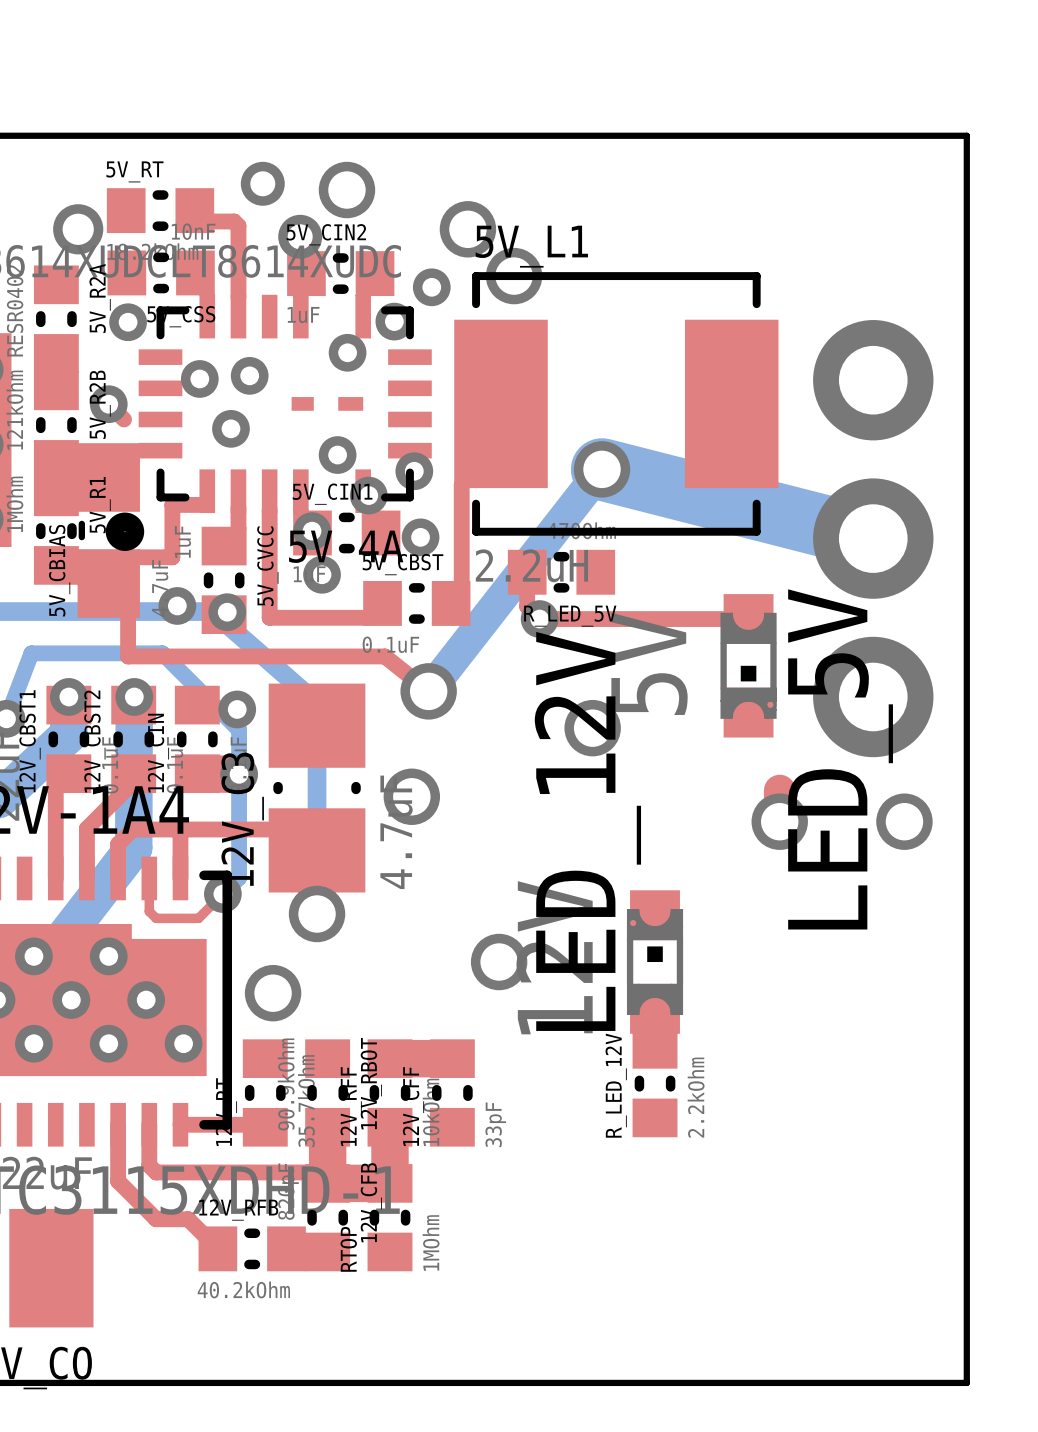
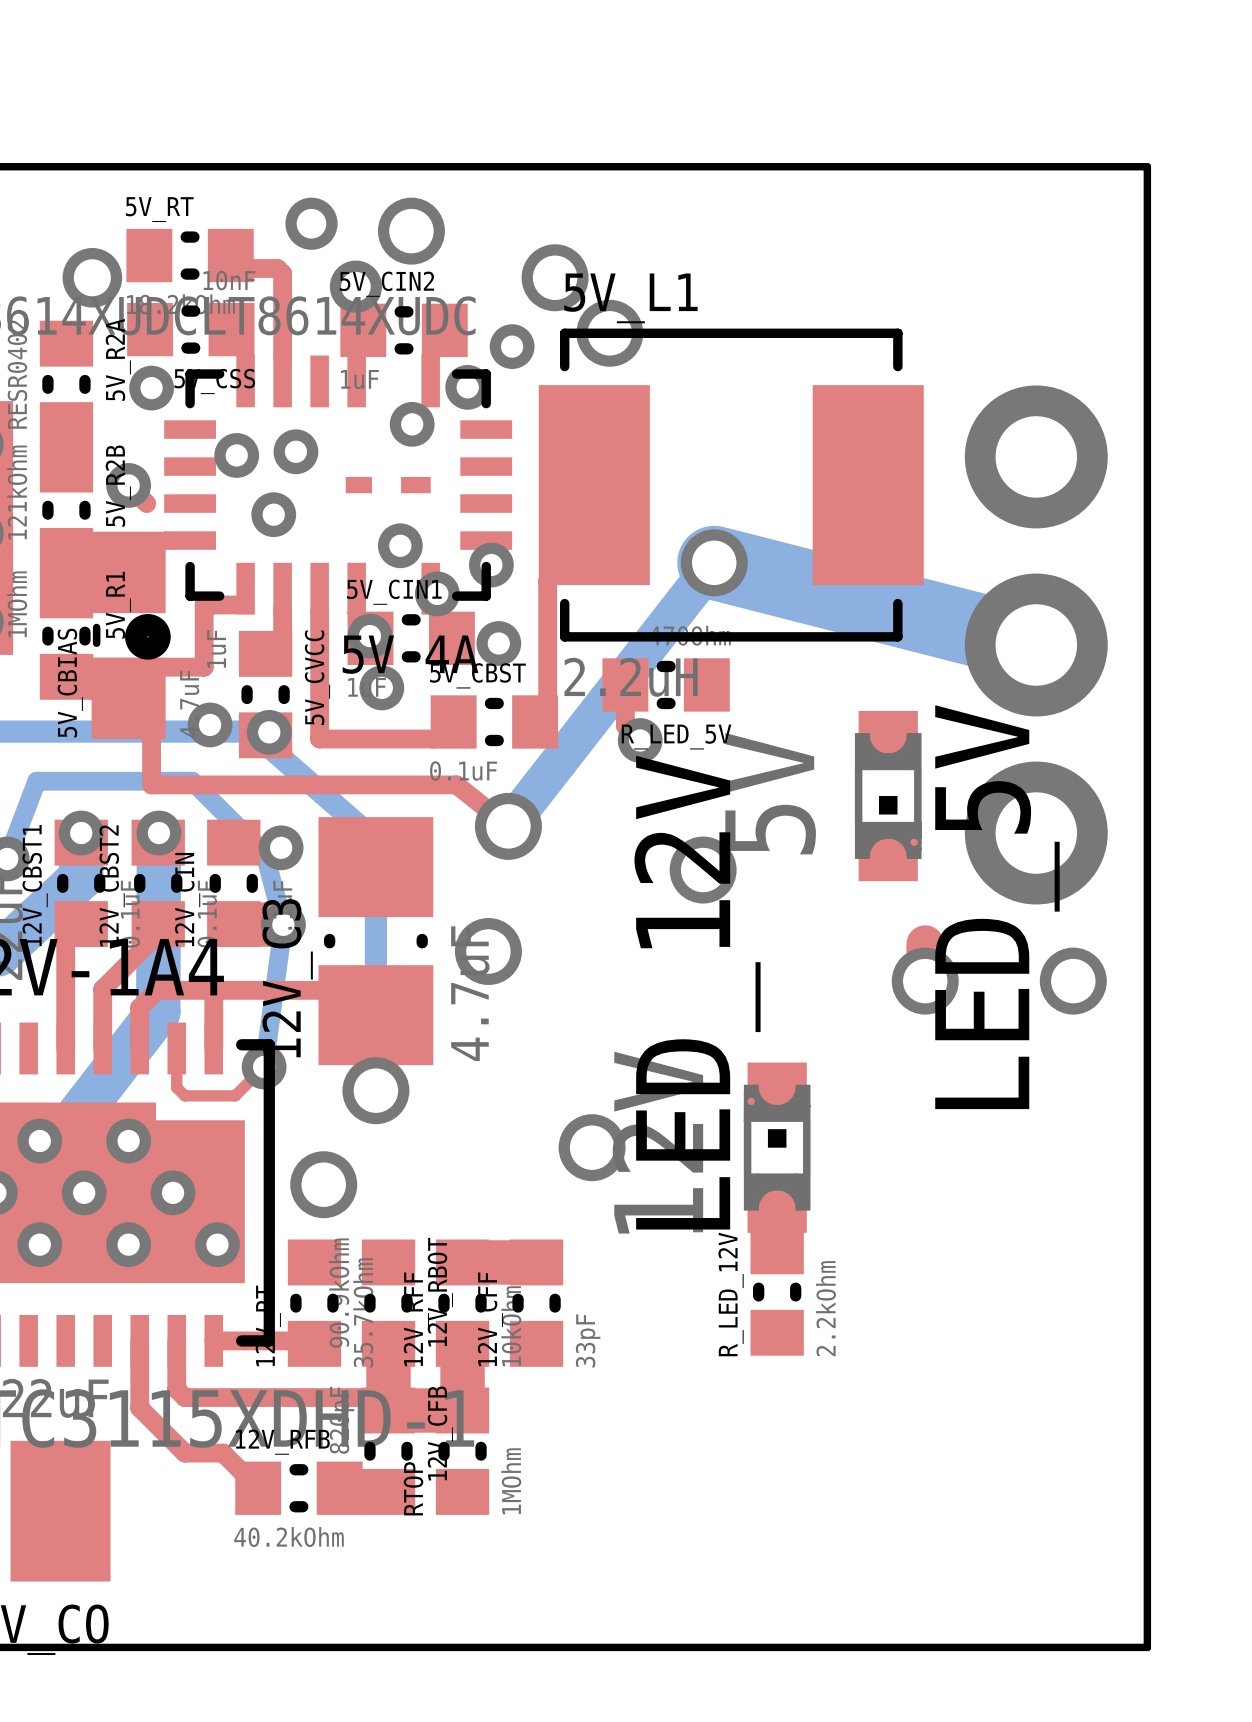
top track: (539, 619) (748, 619) -> none
bottom track: (223, 714) (239, 730) (239, 877) (222, 894) -> (264, 853) (283, 924) (264, 1066)

